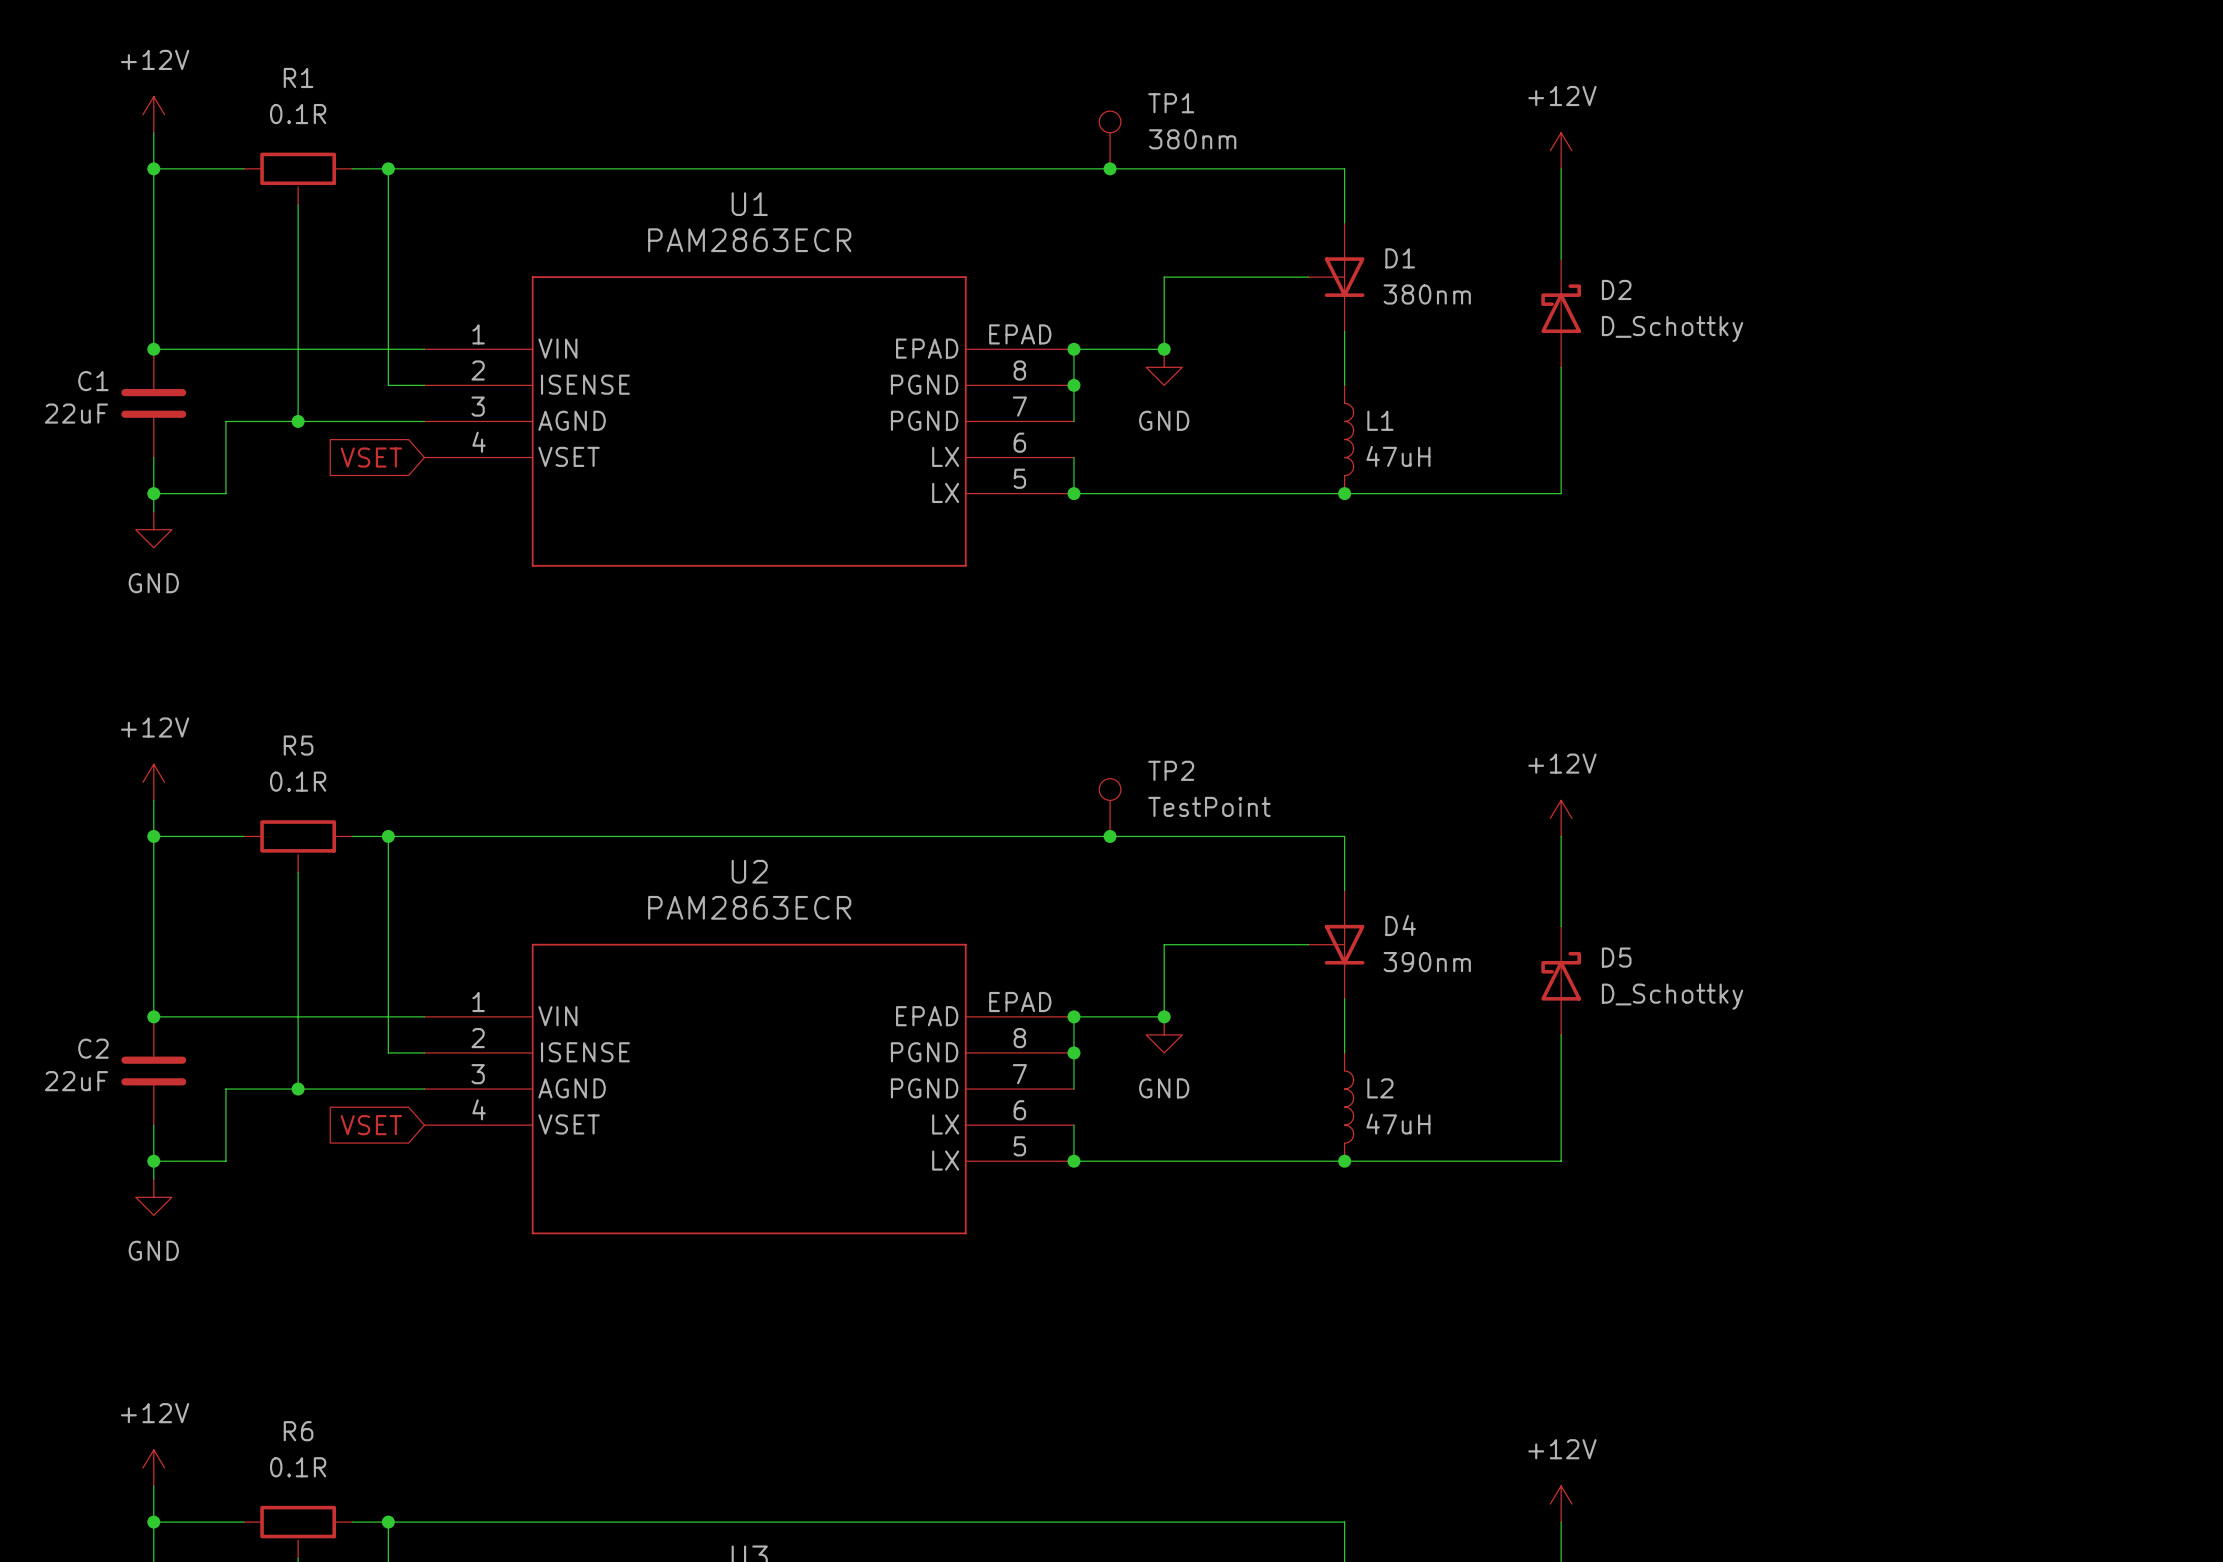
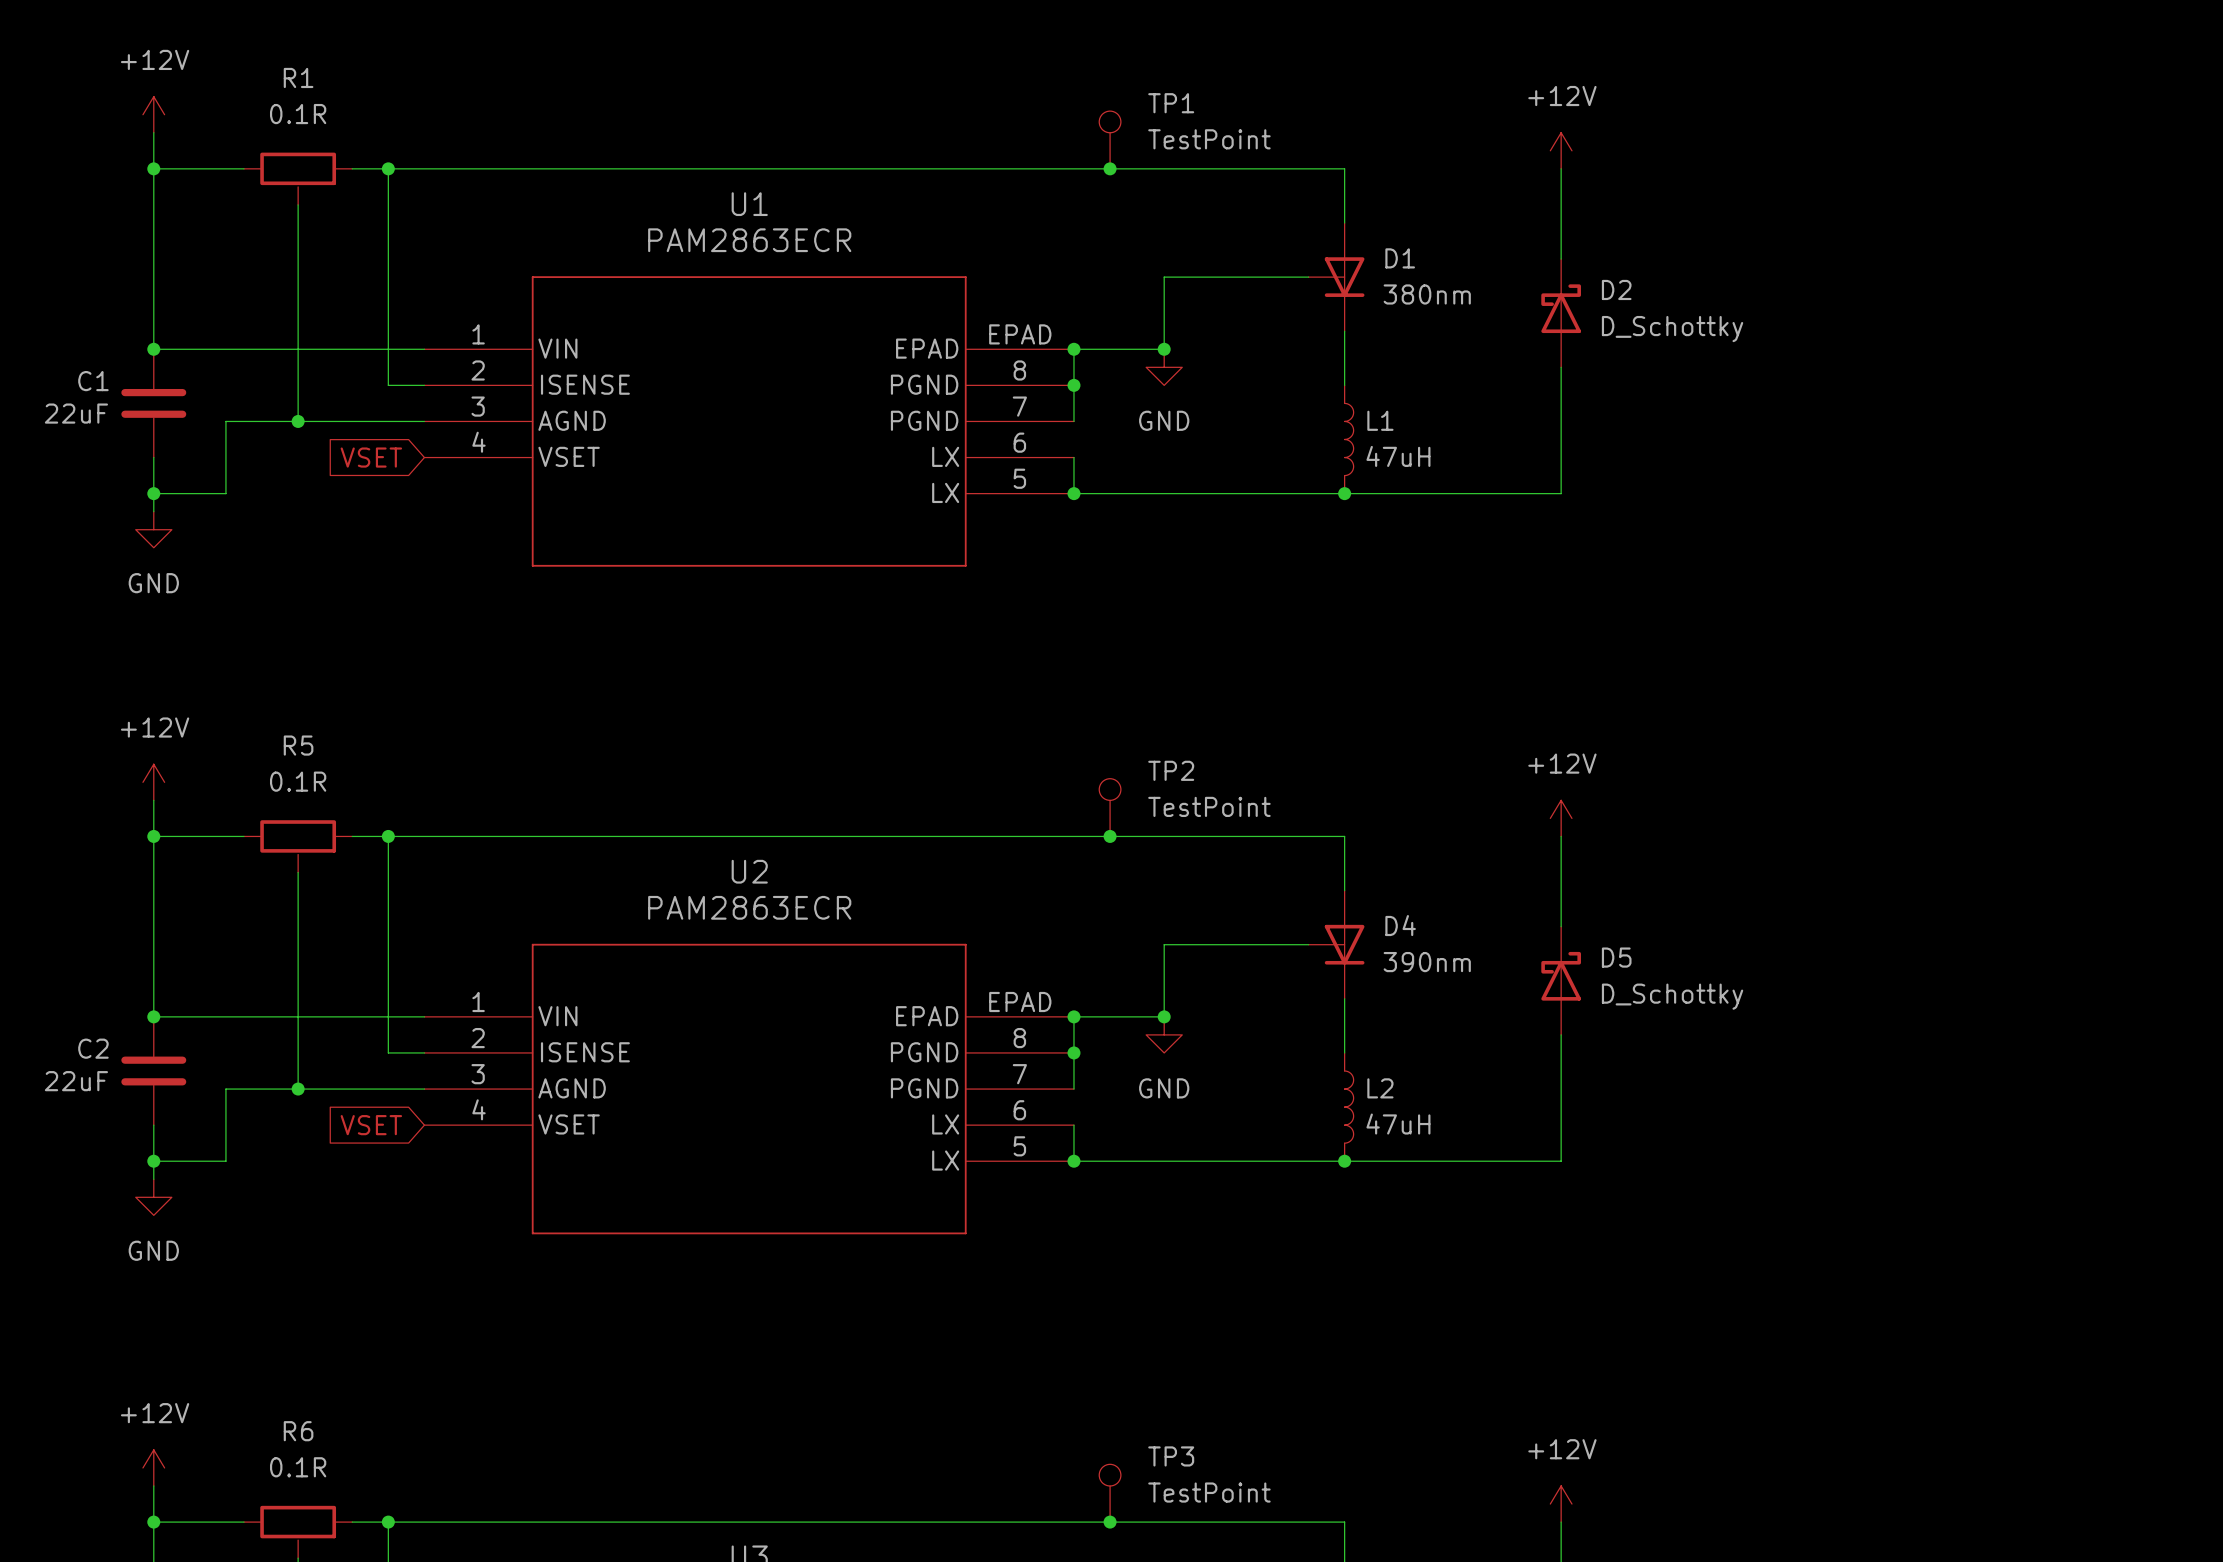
TP1 value: 380nm (1192, 139) -> TestPoint (1209, 139)
TP3: none -> TestPoint (1110, 1493)
junction: none -> (1110, 1522)

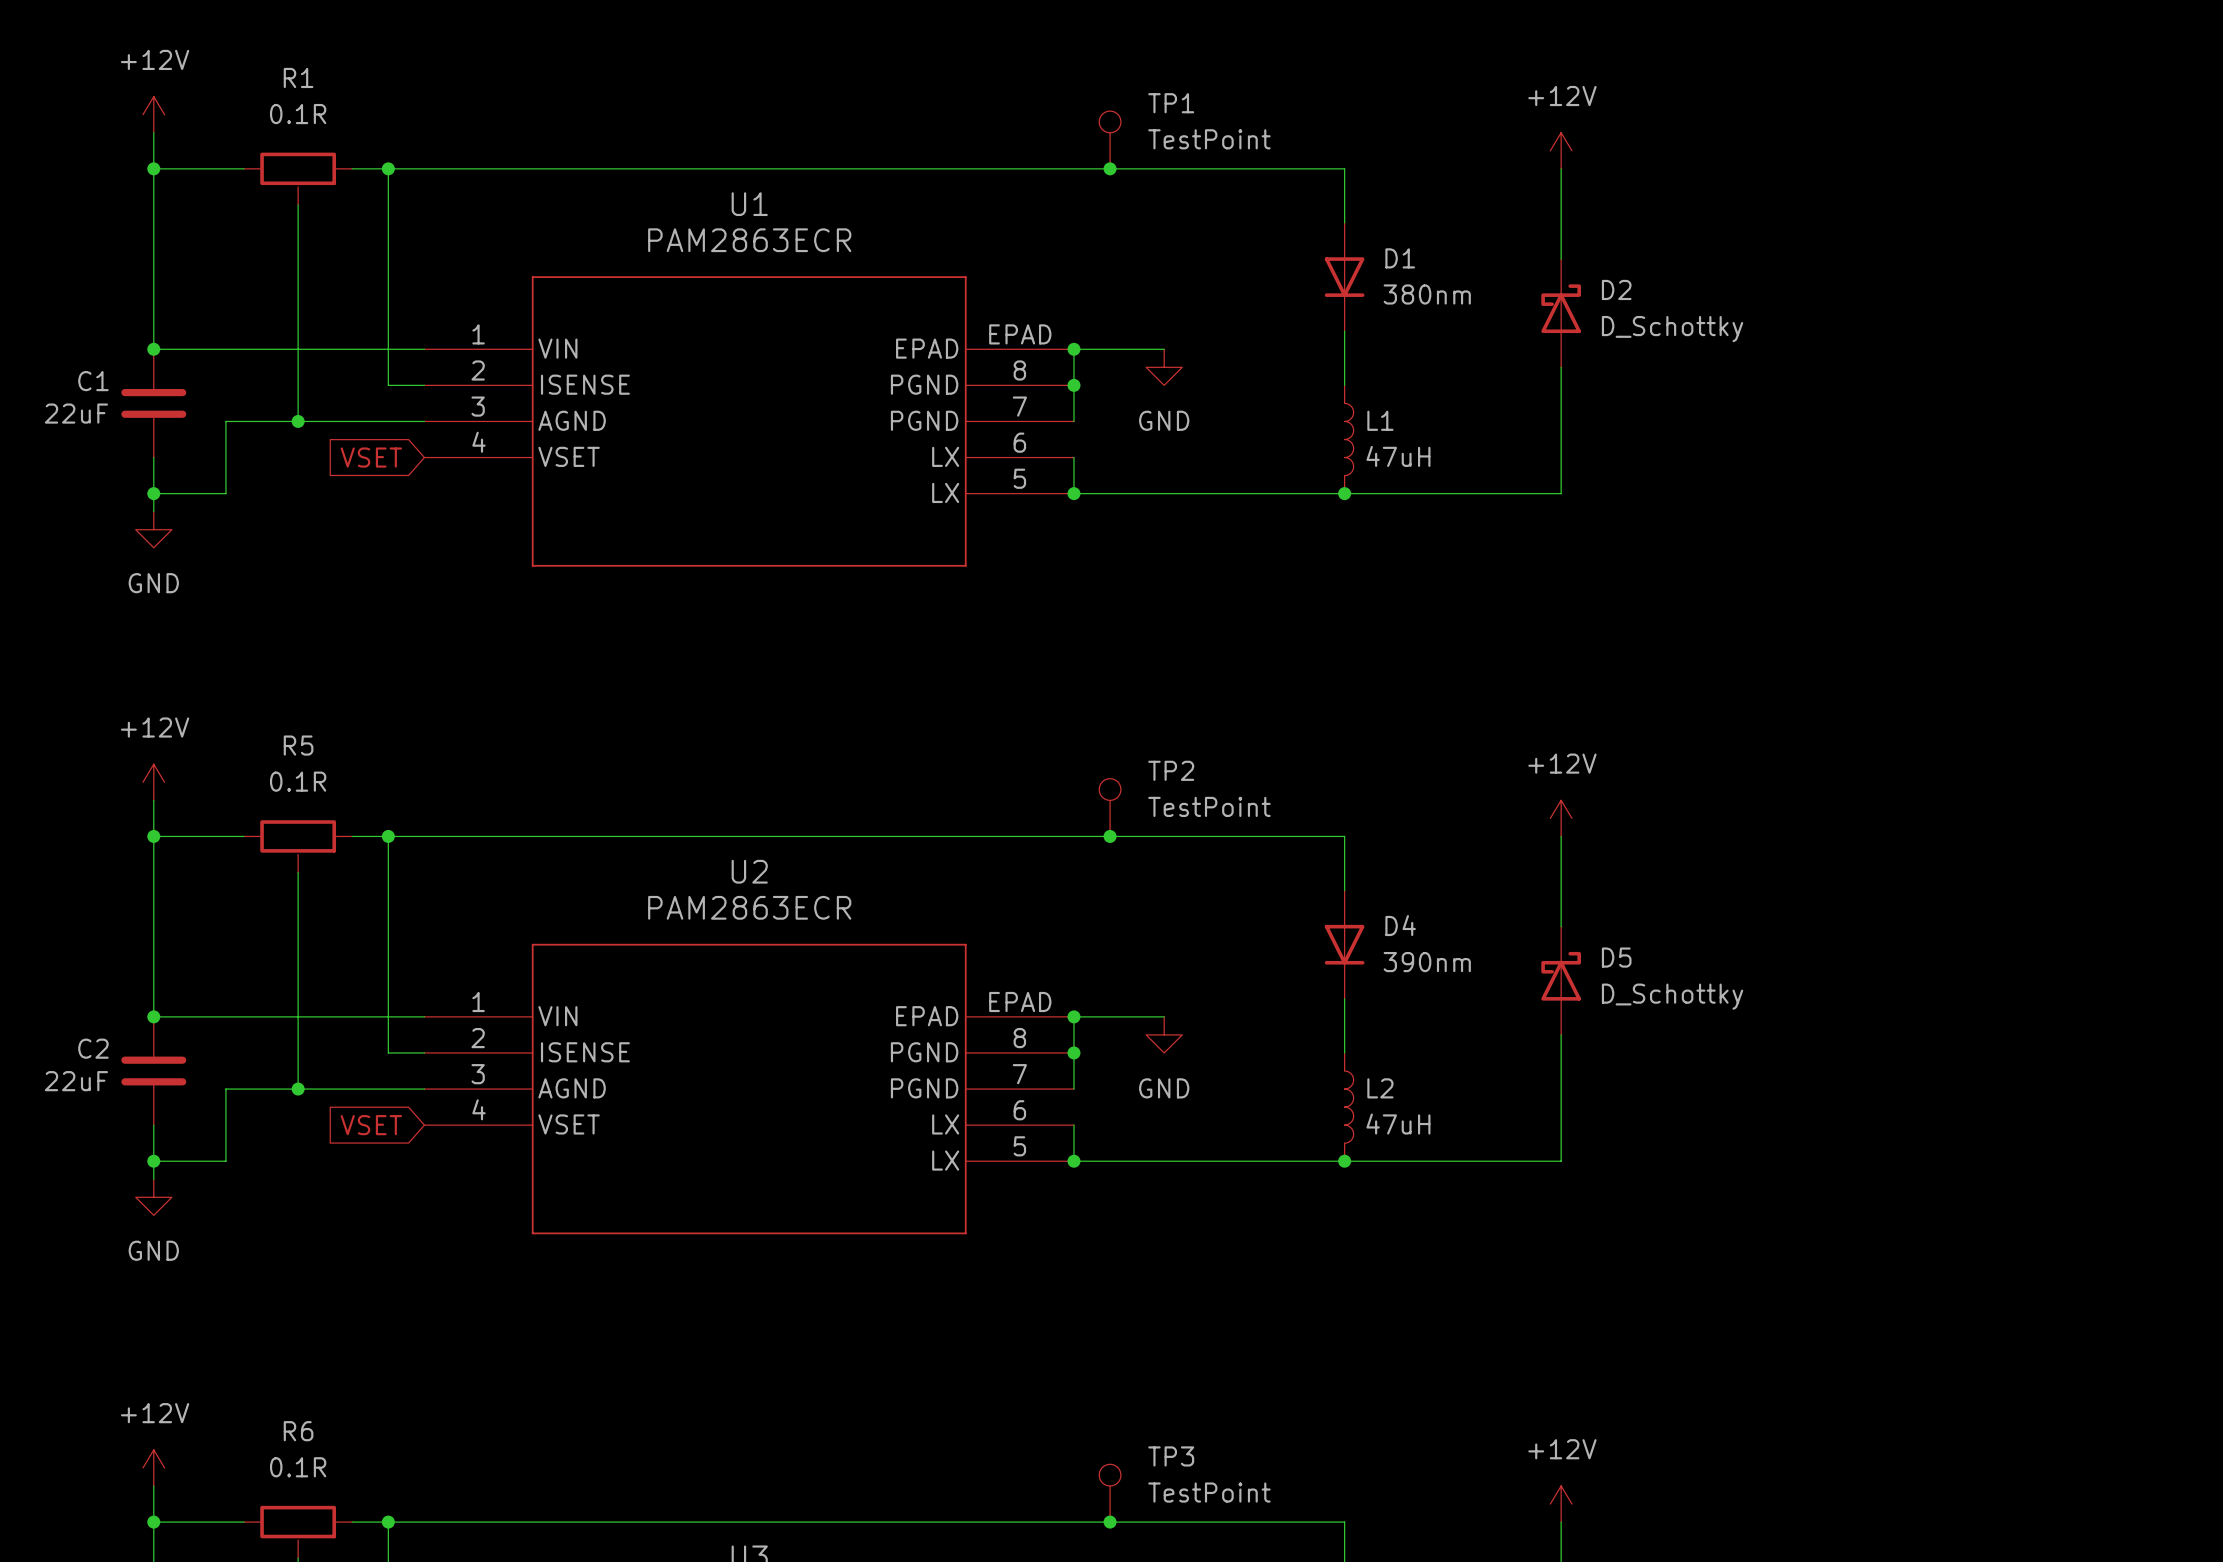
D1 symbol: [1308, 222, 1365, 332] -> [1324, 222, 1365, 332]
wire: (1308, 277) (1164, 277) (1164, 349) -> none
junction: (1164, 349) -> none
D4 symbol: [1308, 890, 1365, 999] -> [1324, 890, 1365, 999]
wire: (1308, 944) (1164, 944) (1164, 1016) -> none
junction: (1164, 1016) -> none

